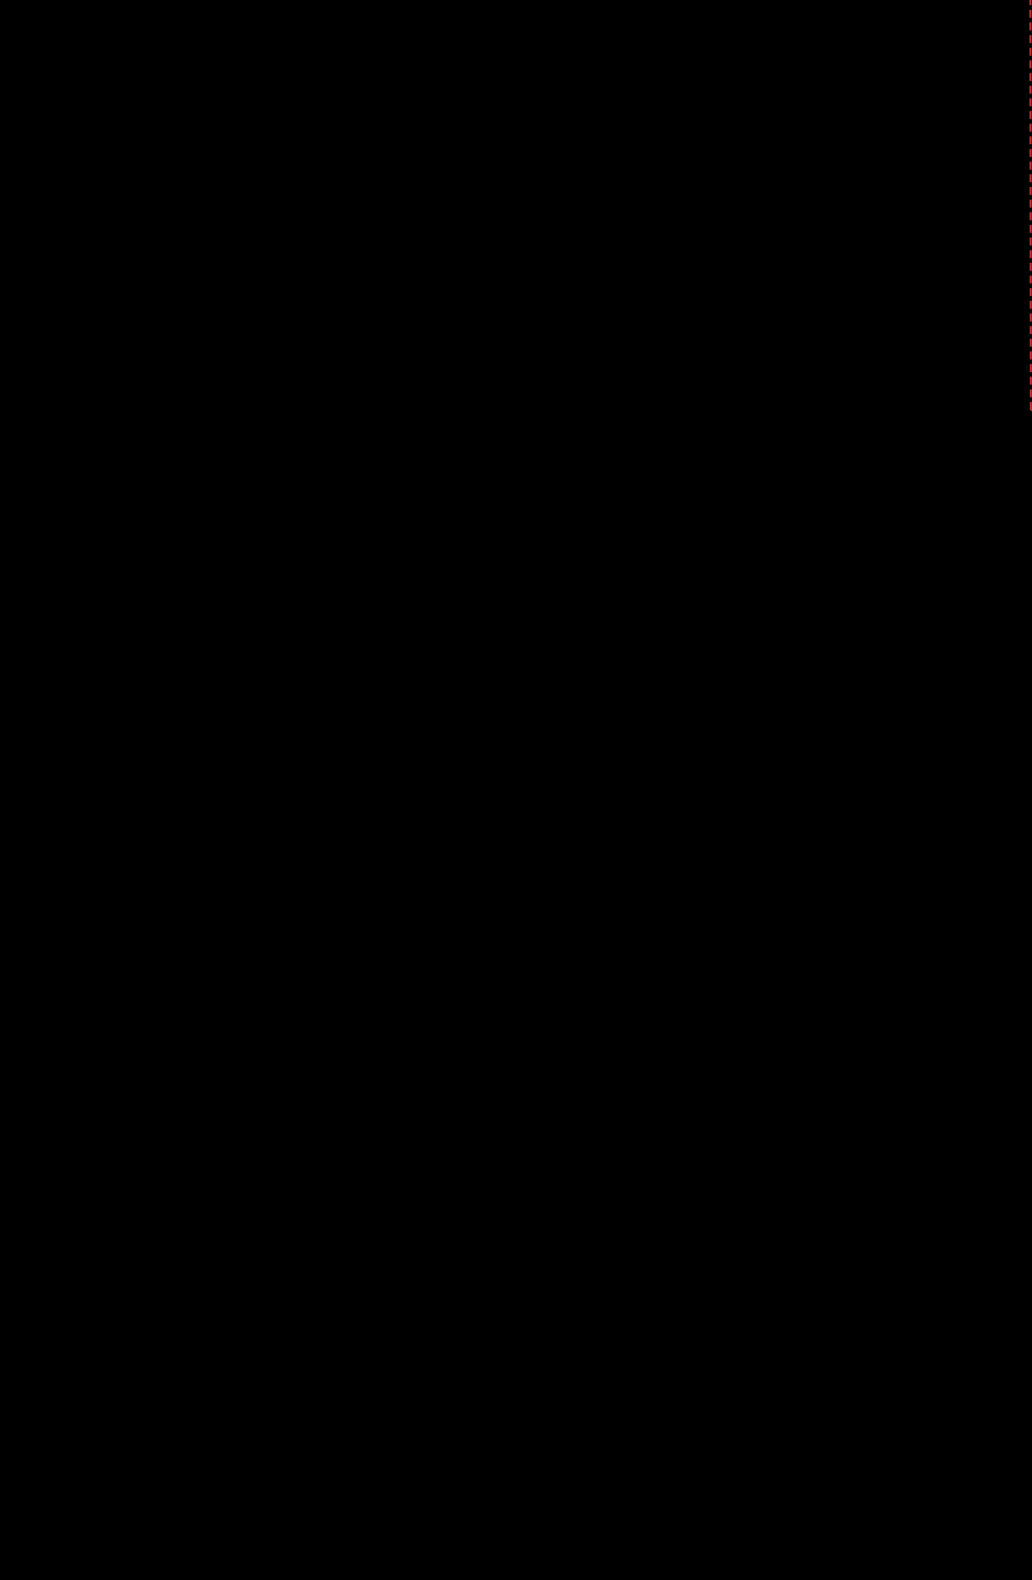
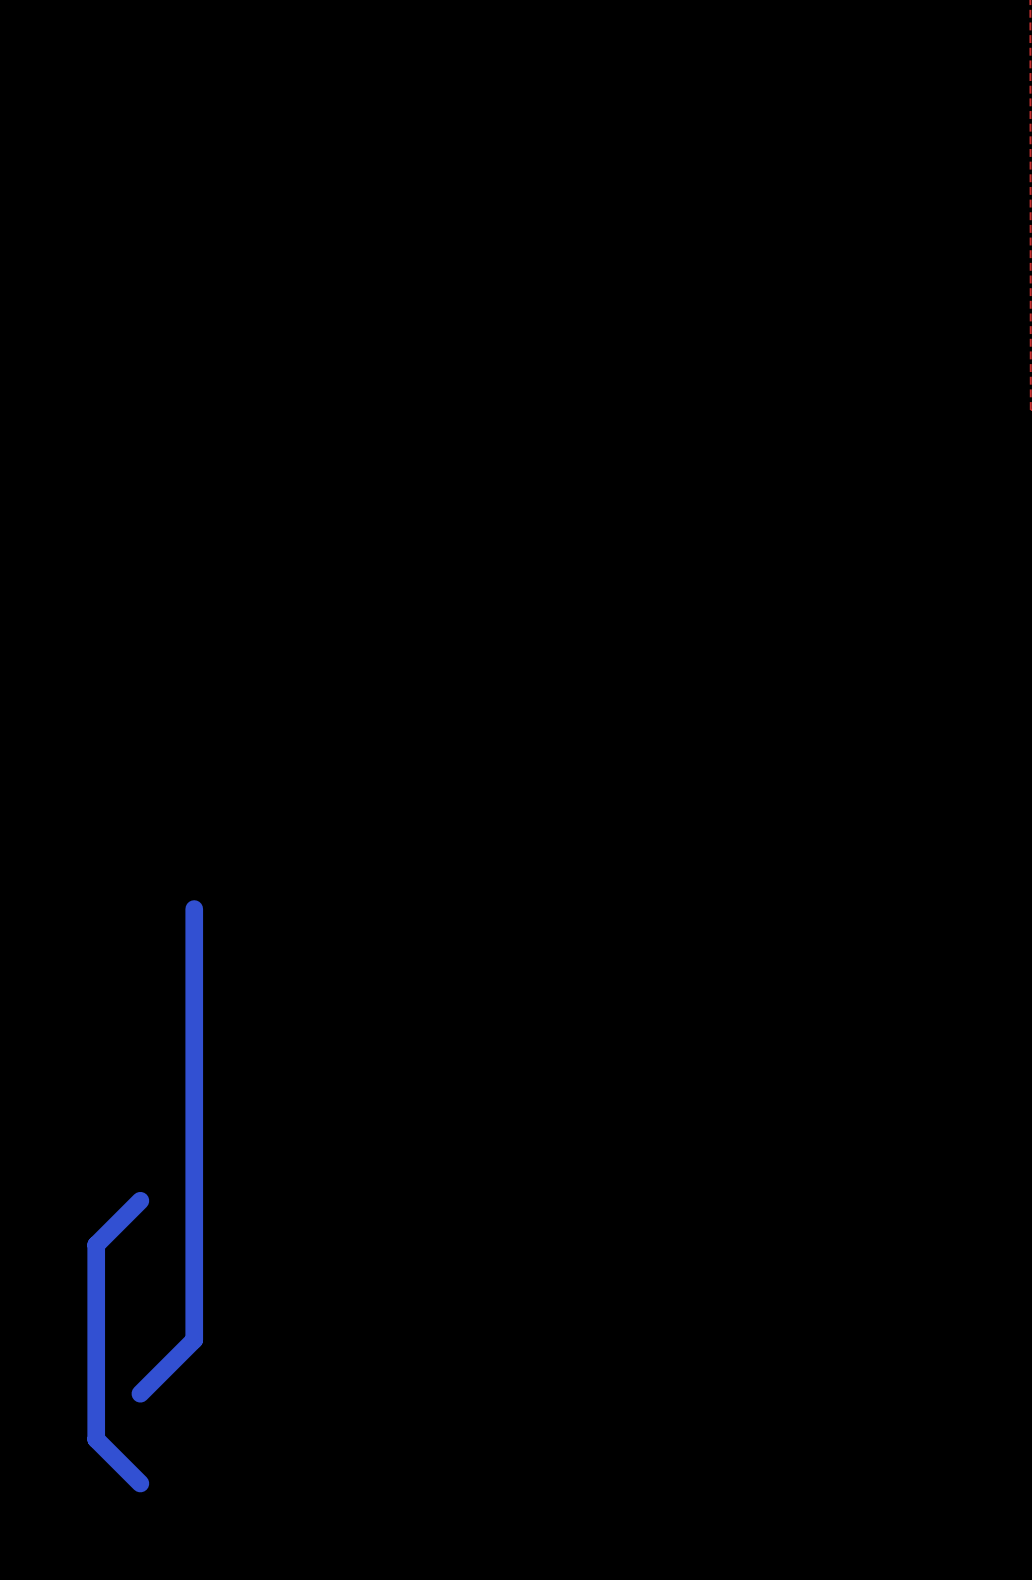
bottom track: none -> (194, 909) (194, 1339) (140, 1393)
bottom track: none -> (140, 1200) (96, 1244) (96, 1439) (140, 1483)

